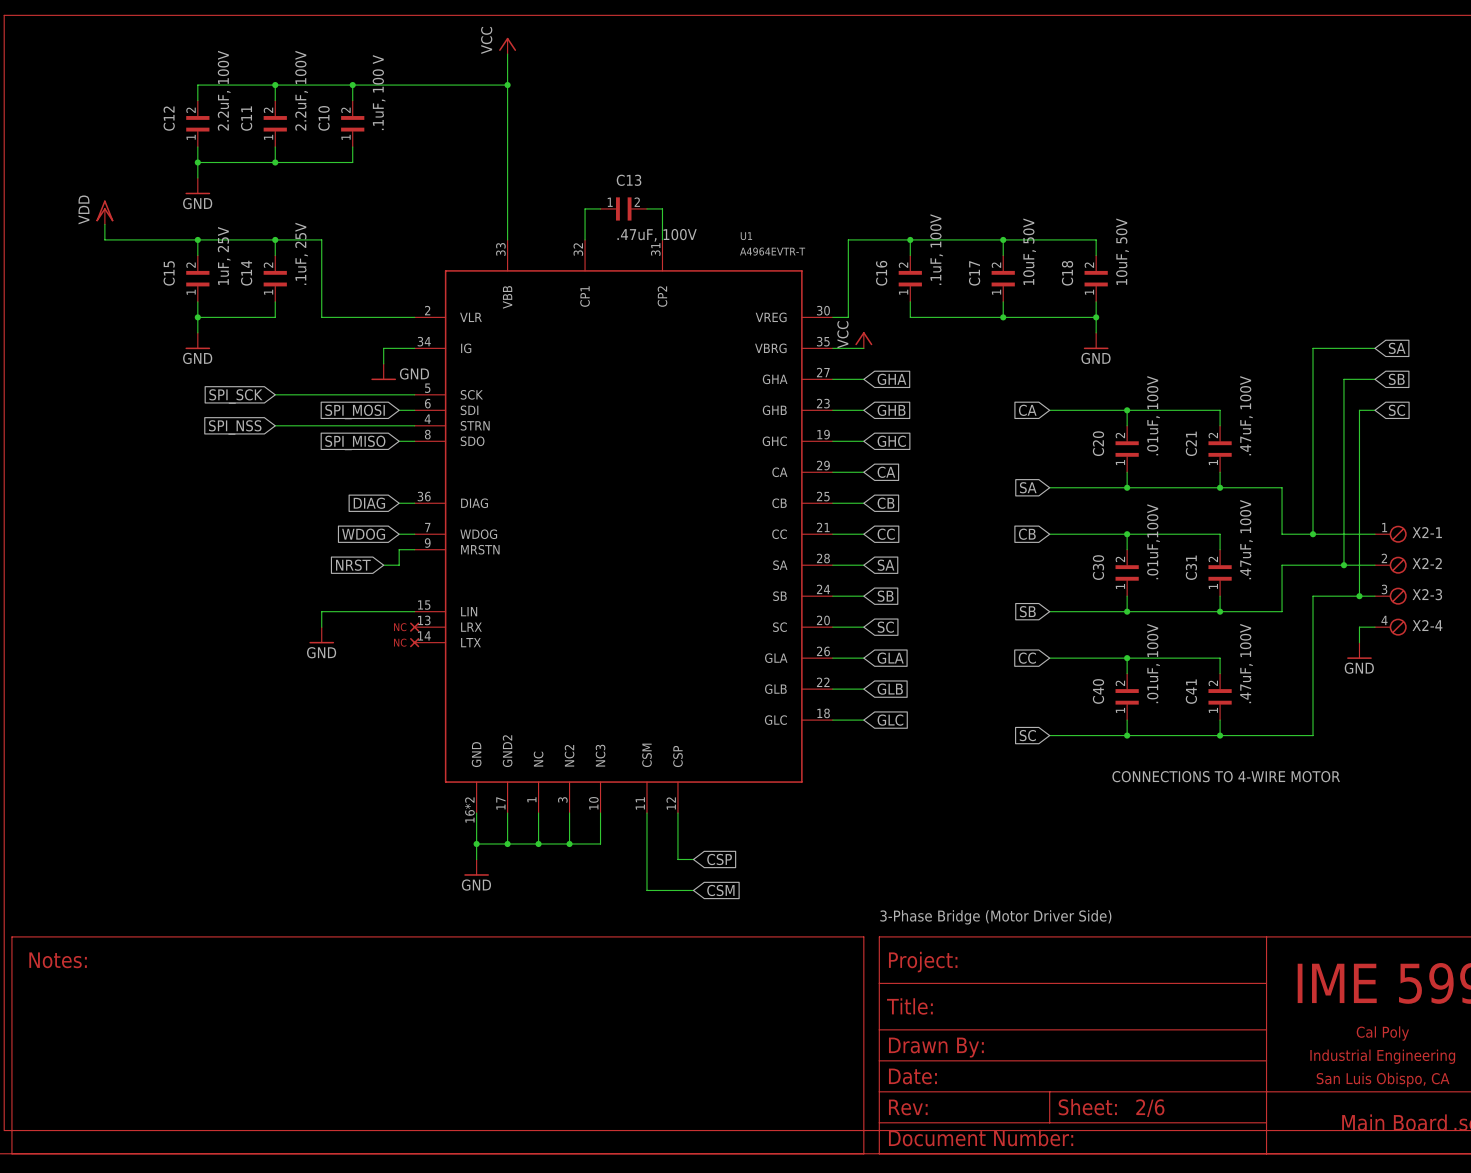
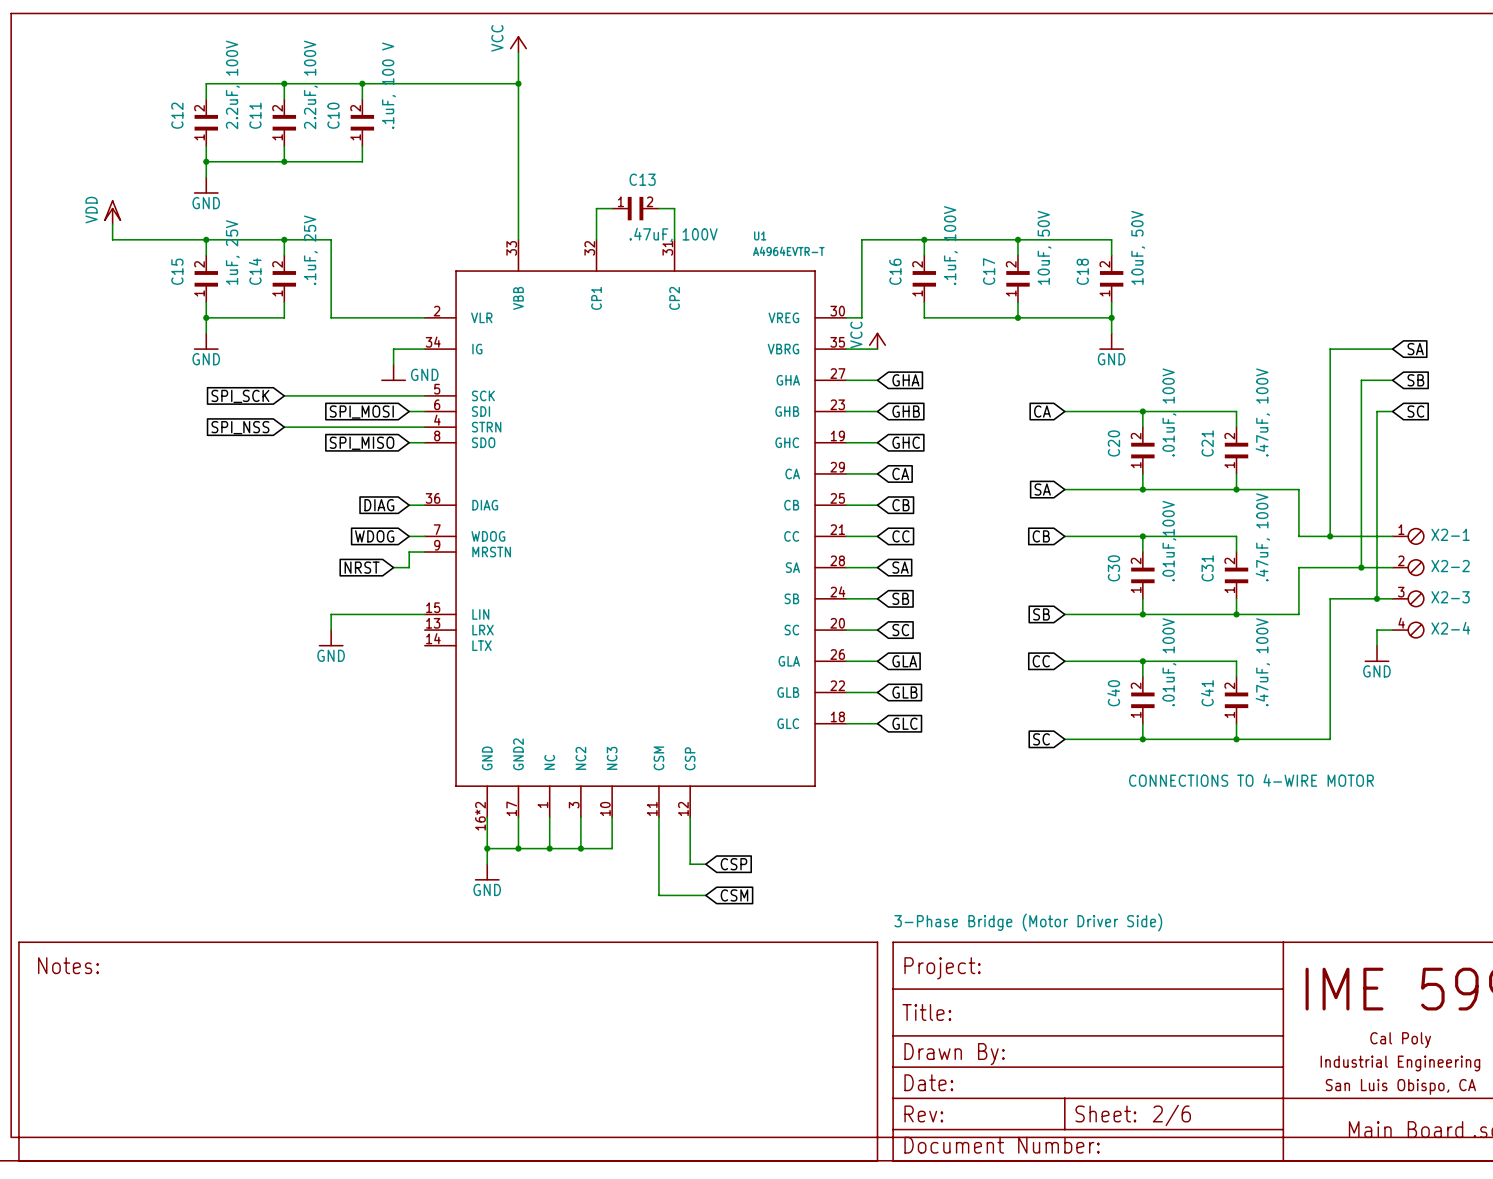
part: (414, 627) -> none
part: (414, 642) -> none

